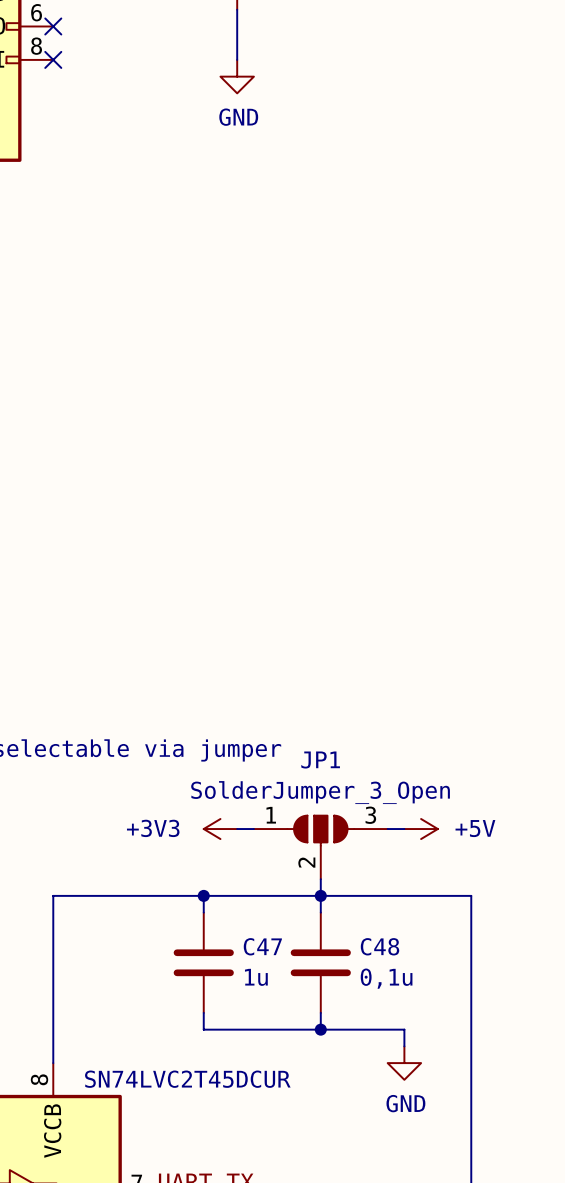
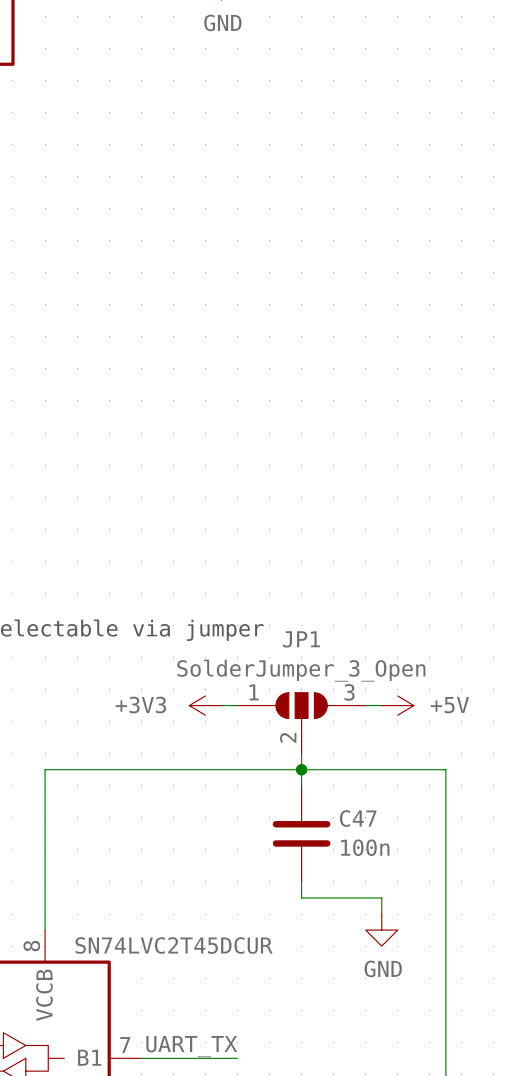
wire: (203, 895) (203, 912) -> none
junction: (203, 895) -> none
C48 name: C48 (380, 946) -> C47 (358, 818)
C47: 1u (203, 962) -> none
C48 value: 0,1u (386, 978) -> 100n (365, 847)
wire: (203, 1012) (203, 1029) (320, 1029) -> none
junction: (320, 1029) -> none

